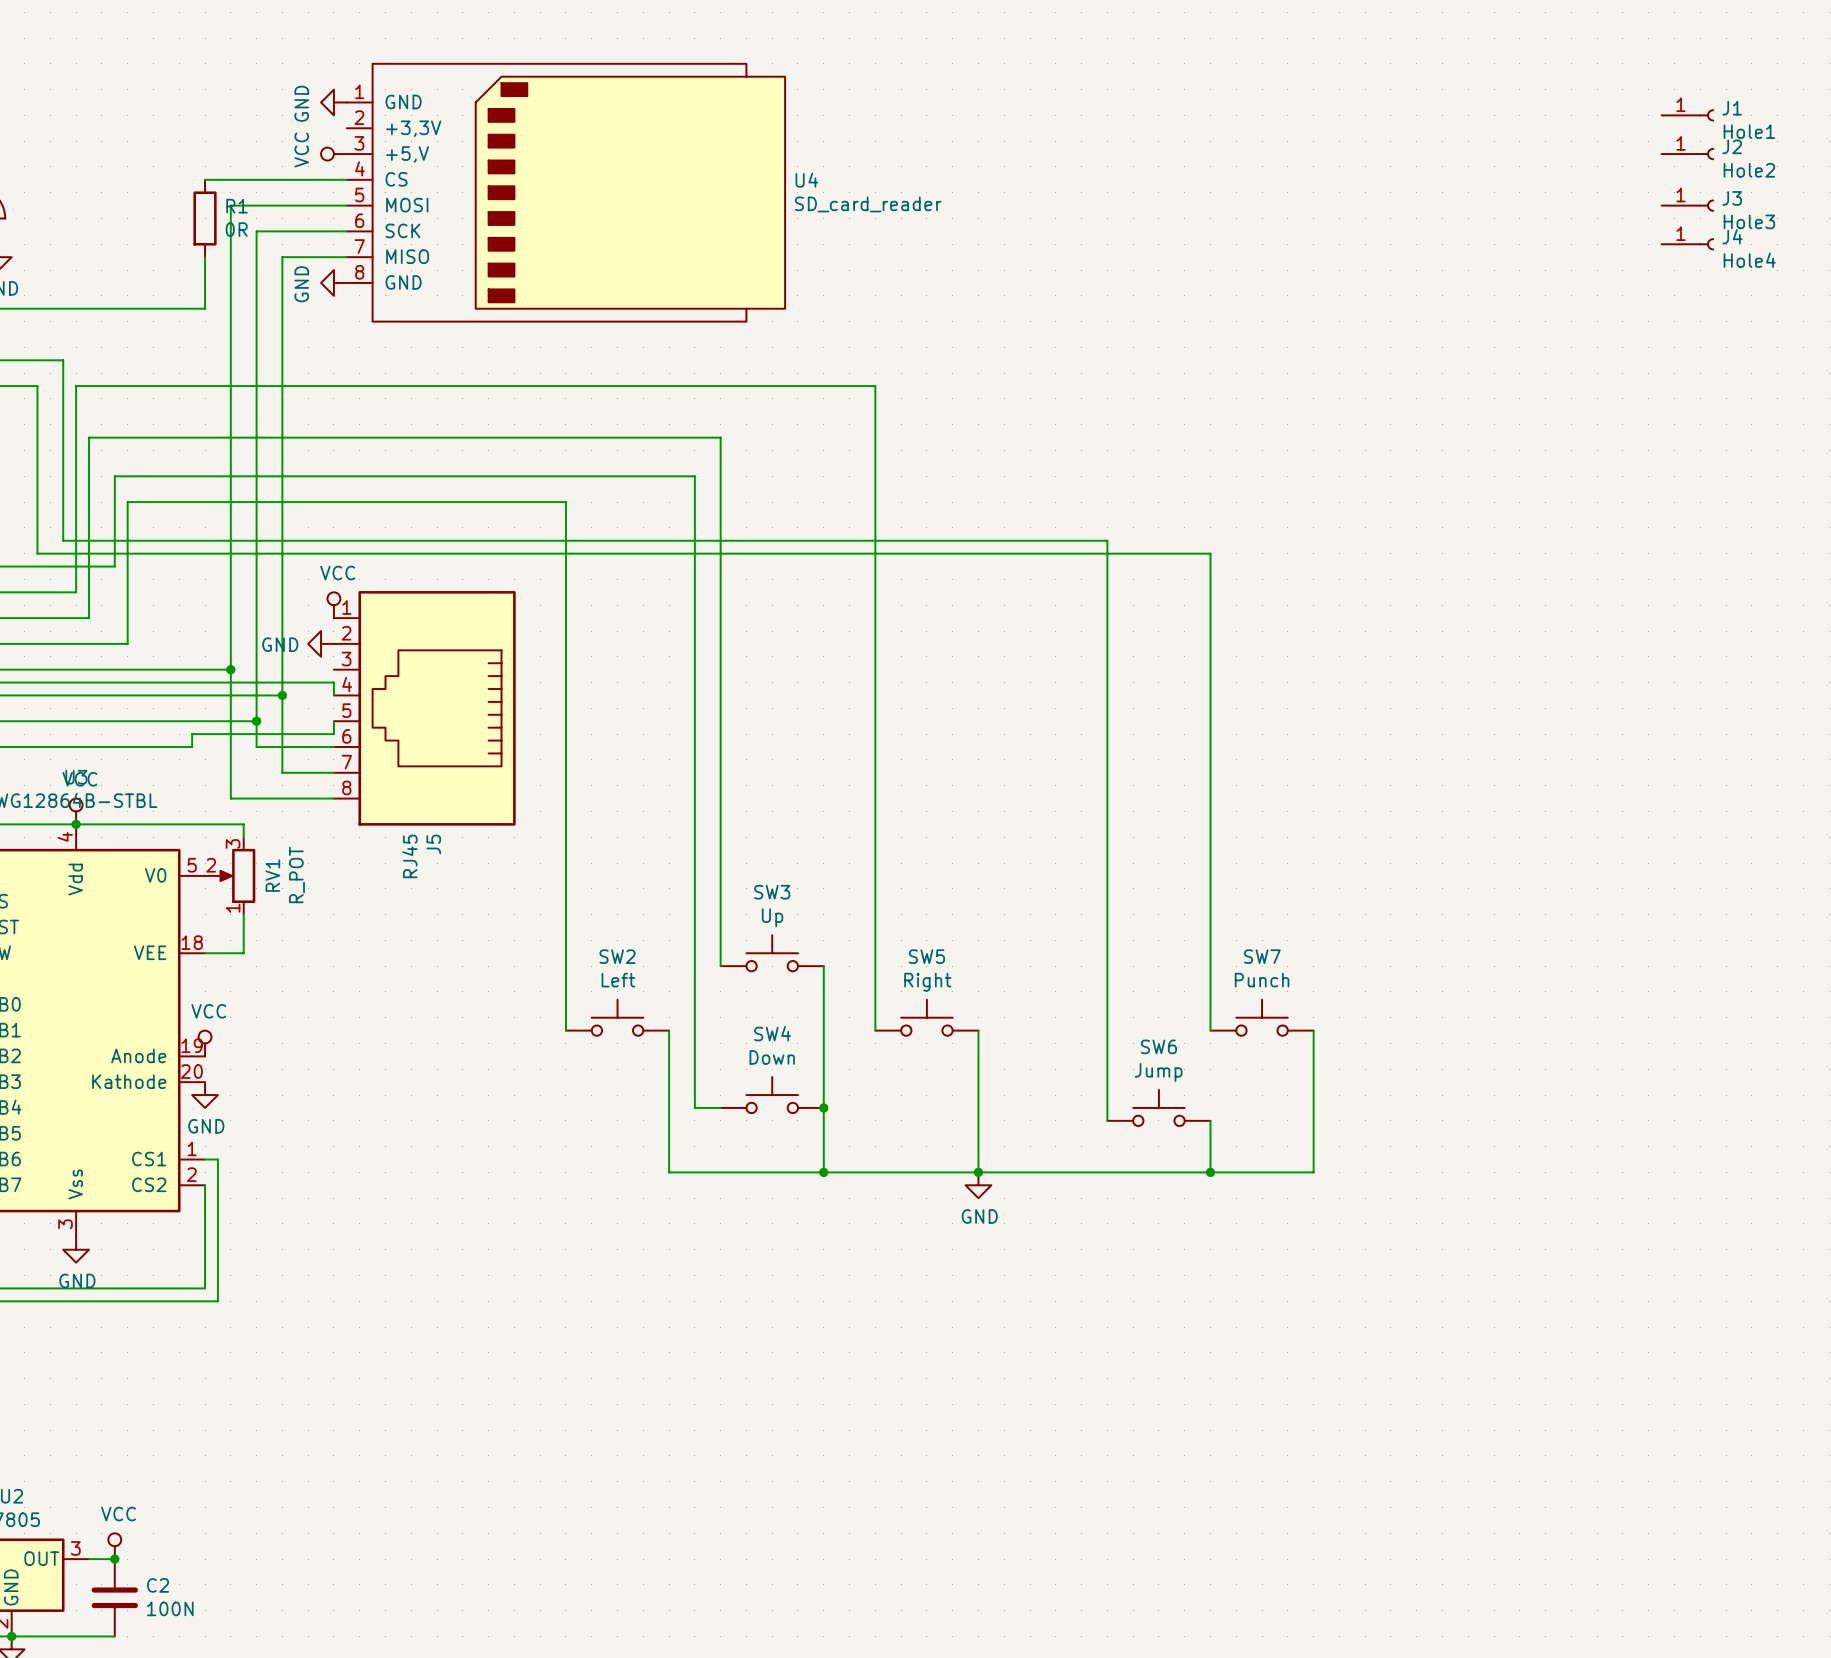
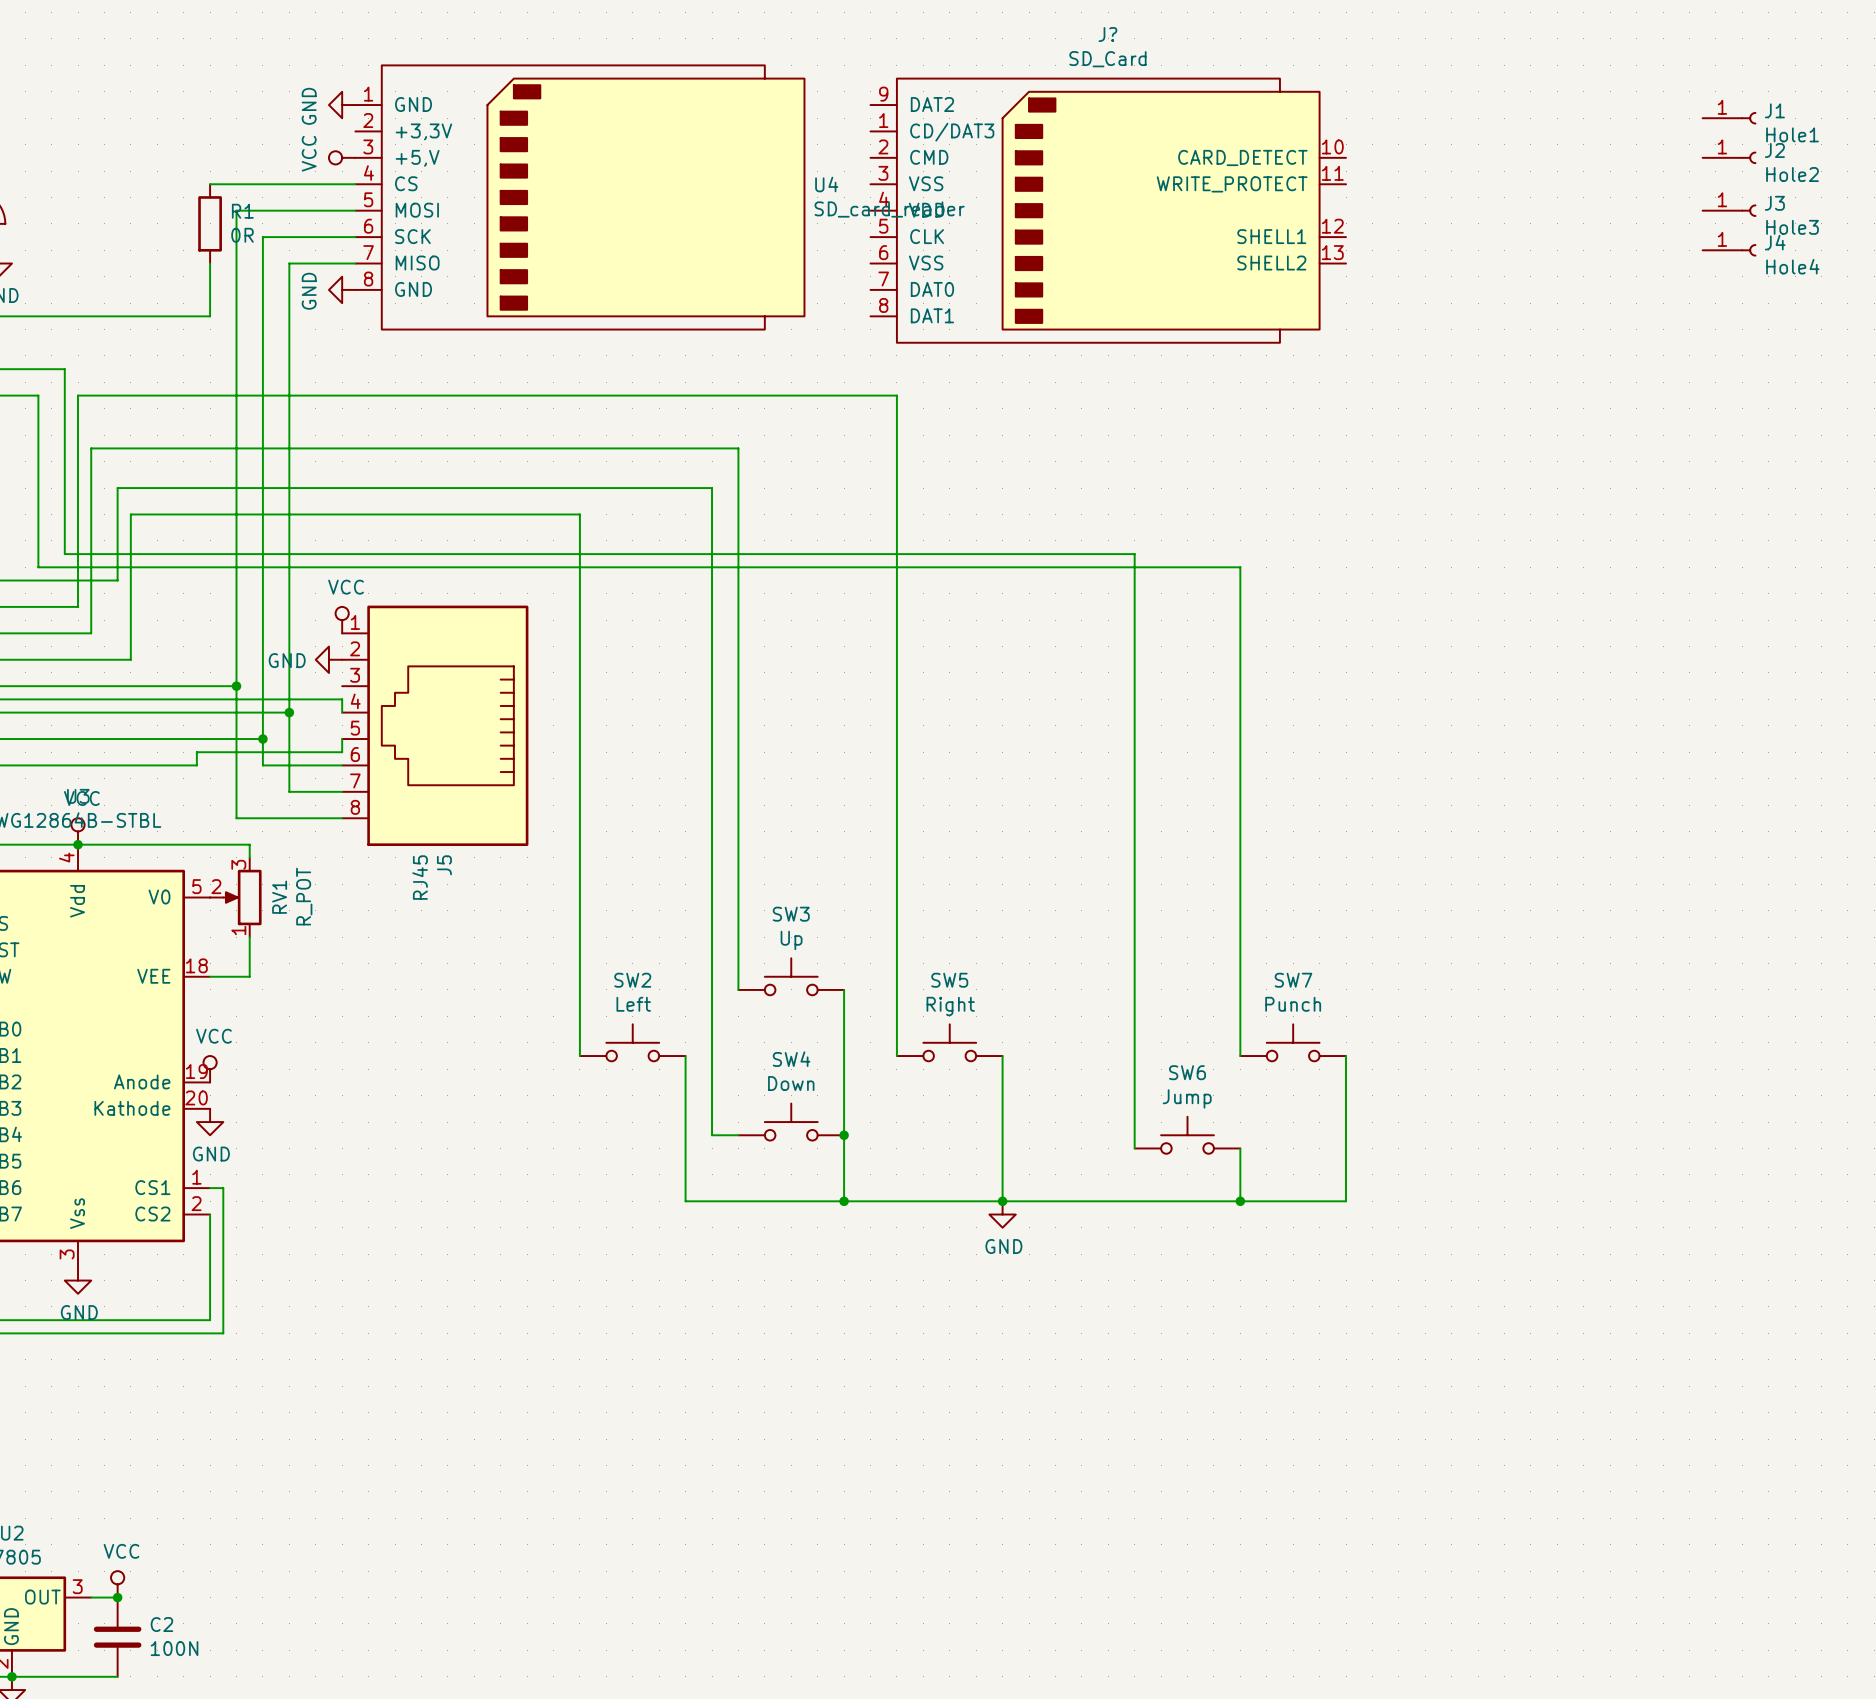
J?: none -> SD_Card (1108, 210)

